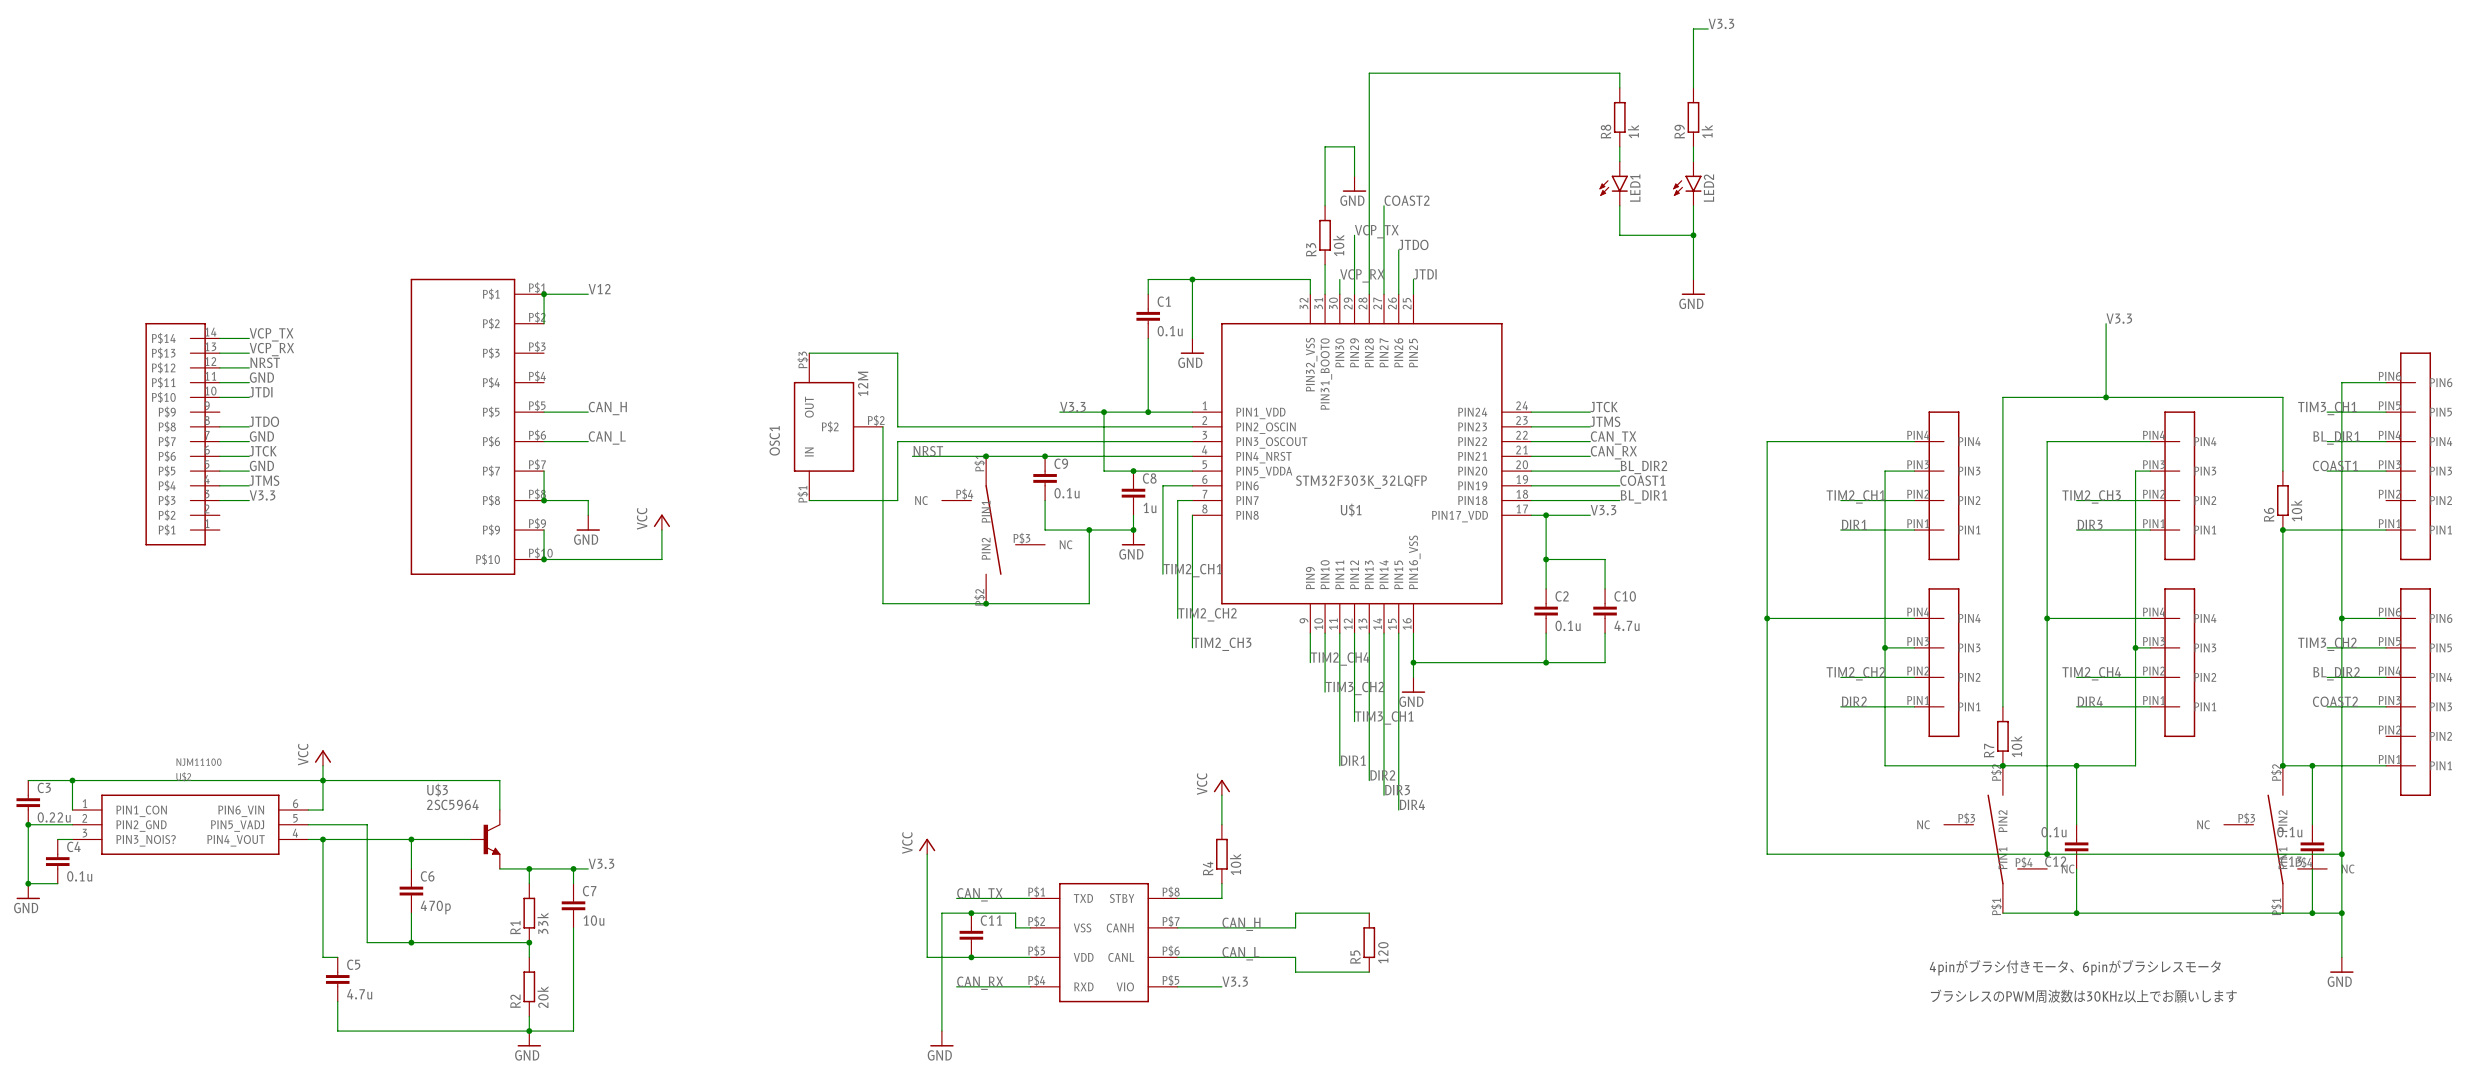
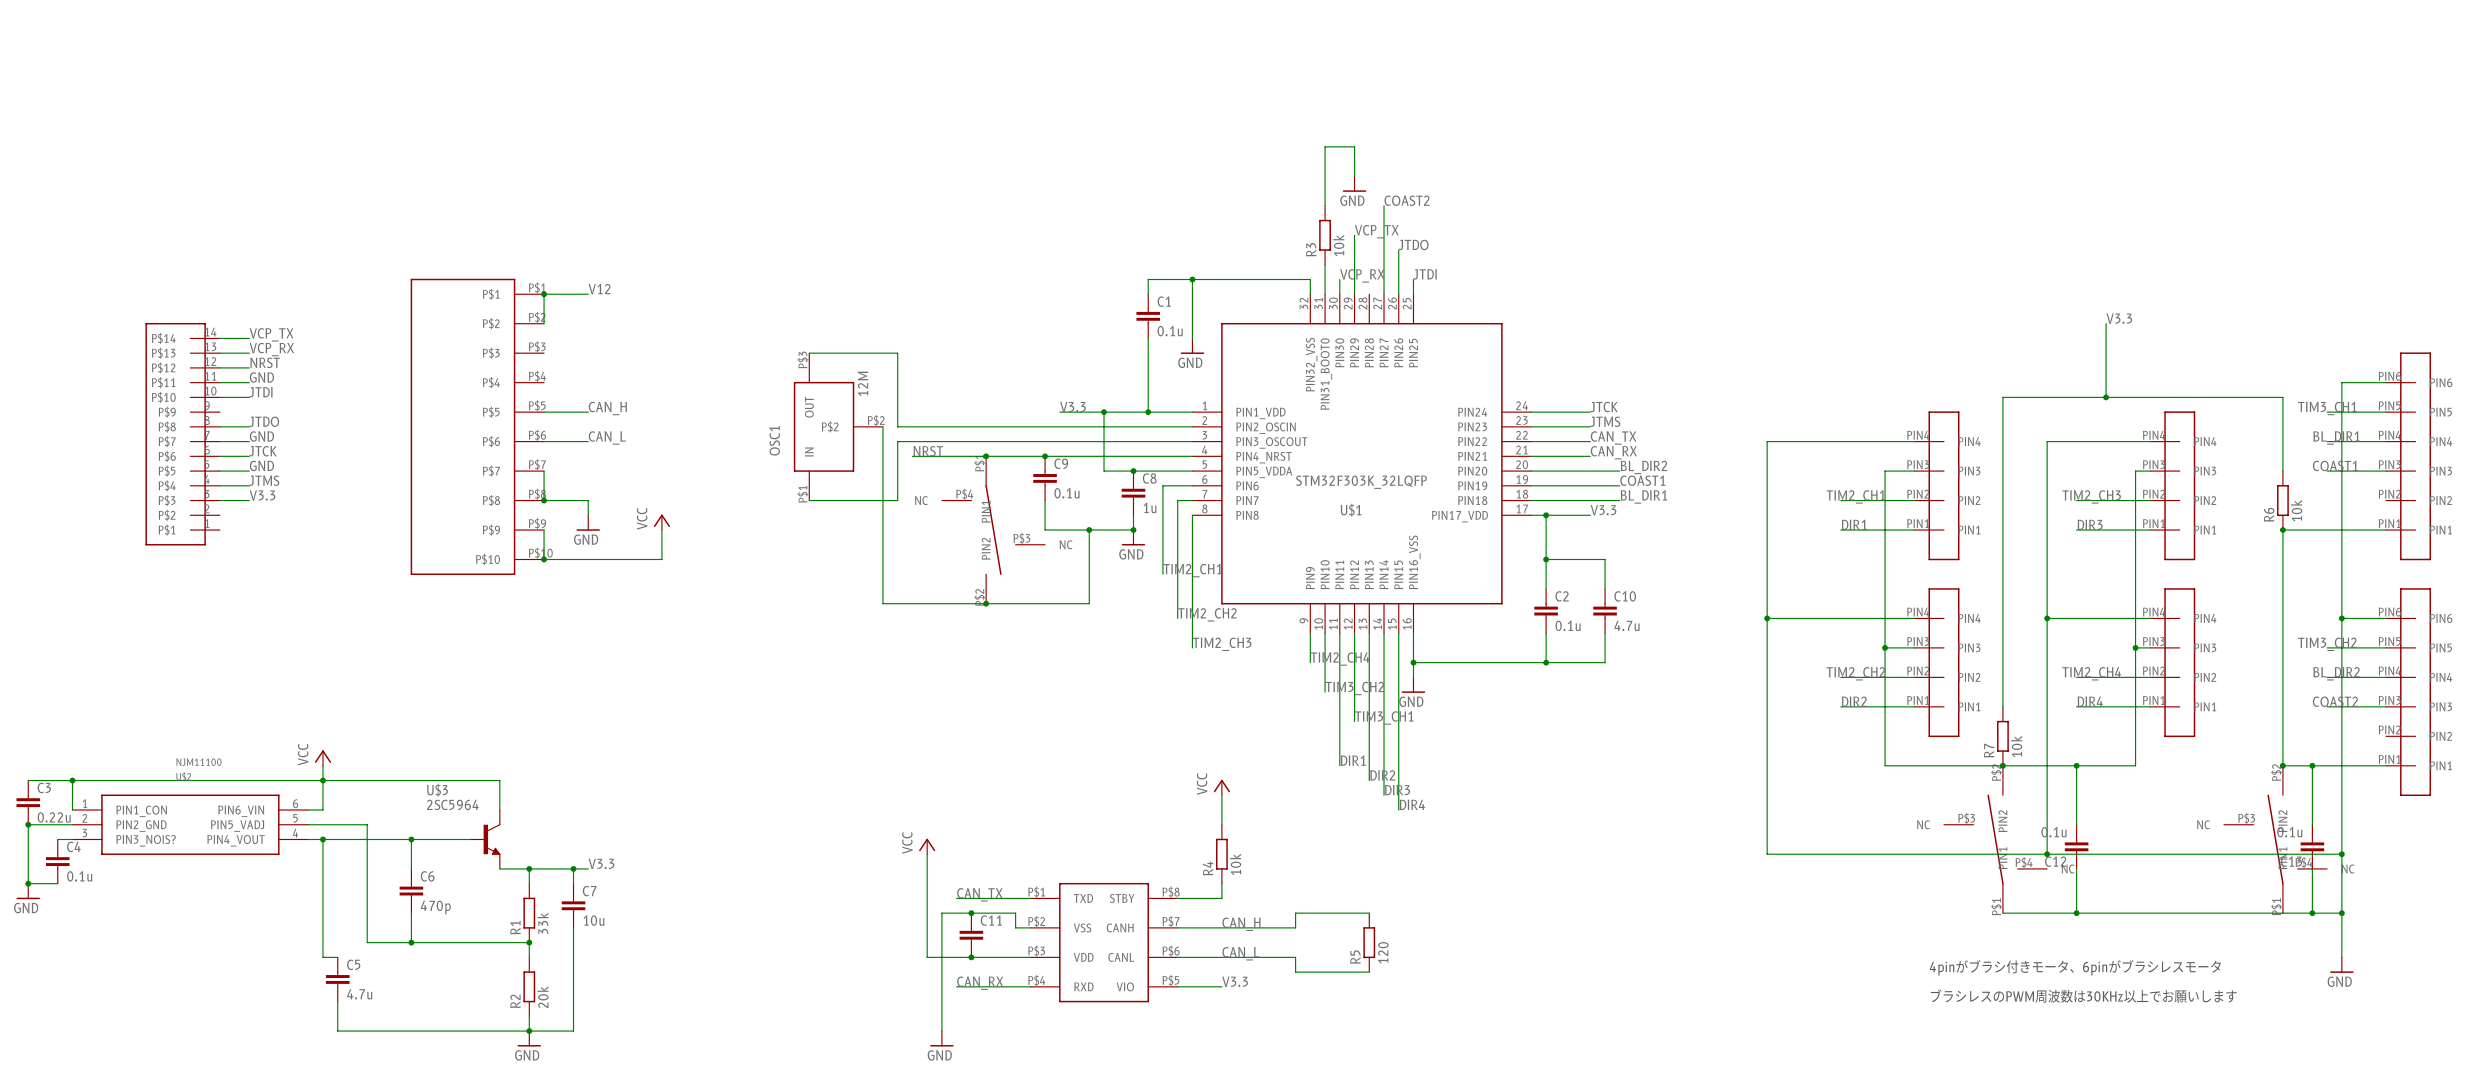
label: V3.3 (1721, 23) -> none
wire: (1708, 28) (1693, 28) (1693, 87) -> none
wire: (1619, 87) (1619, 73) (1369, 73) (1369, 294) -> none
R8: 1k (1619, 117) -> none
R9: 1k (1693, 117) -> none
wire: (1619, 146) (1619, 161) -> none
wire: (1693, 146) (1693, 161) -> none
LED1: (1613, 183) -> none
LED2: (1687, 183) -> none
wire: (1619, 205) (1619, 235) (1693, 235) -> none
wire: (1693, 205) (1693, 279) -> none
junction: (1693, 235) -> none
power symbol: GND (1693, 287) -> none

